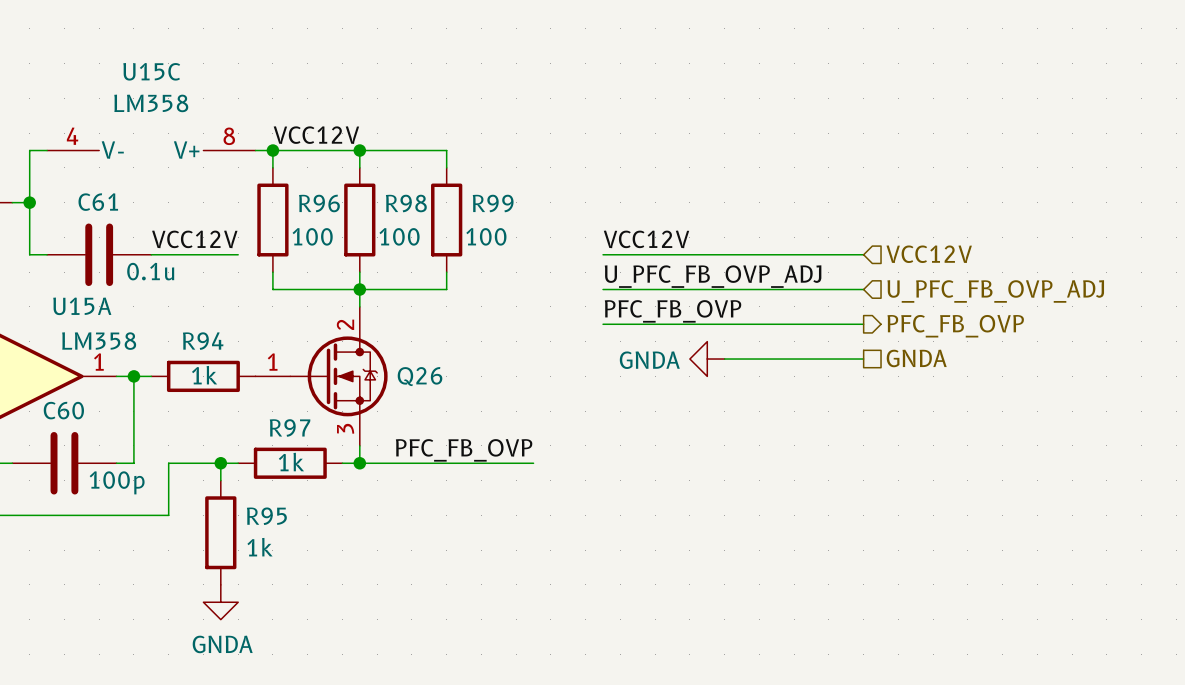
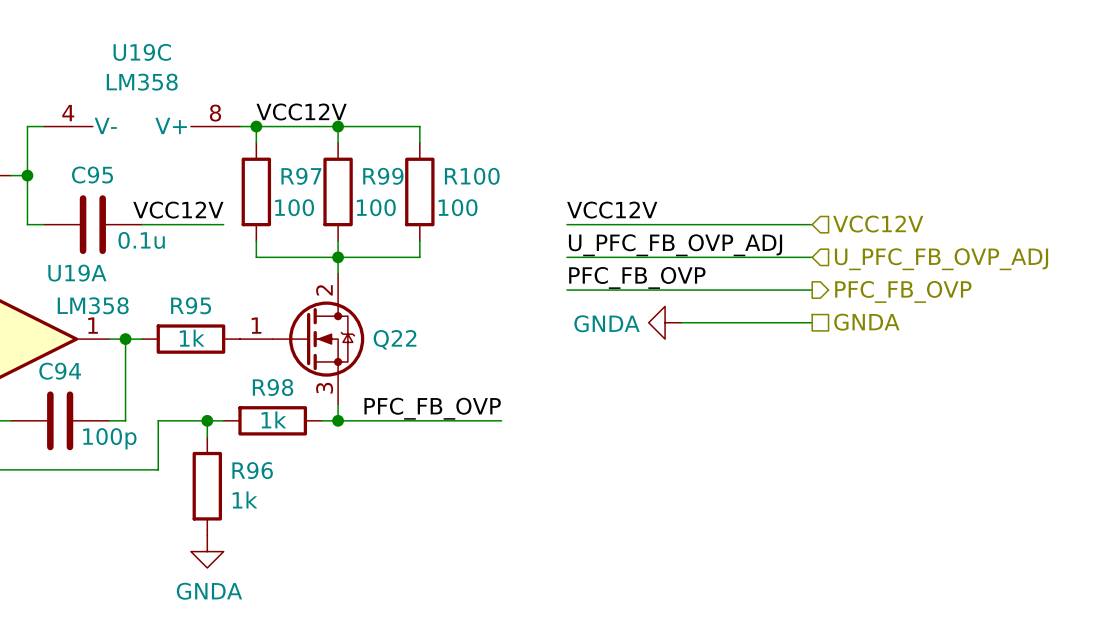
U15C name: U15C (151, 71) -> U19C (142, 52)
C61 name: C61 (98, 202) -> C95 (92, 175)
R96 name: R96 (319, 203) -> R97 (301, 176)
R98 name: R98 (406, 203) -> R99 (383, 176)
R99 name: R99 (493, 203) -> R100 (472, 176)
U15A name: U15A (82, 306) -> U19A (77, 273)
R94 name: R94 (203, 341) -> R95 (191, 305)
Q26 name: Q26 (420, 376) -> Q22 (395, 339)
C60 name: C60 (63, 410) -> C94 (60, 371)
R97 name: R97 (290, 427) -> R98 (273, 387)
R95 name: R95 (266, 516) -> R96 (252, 470)

